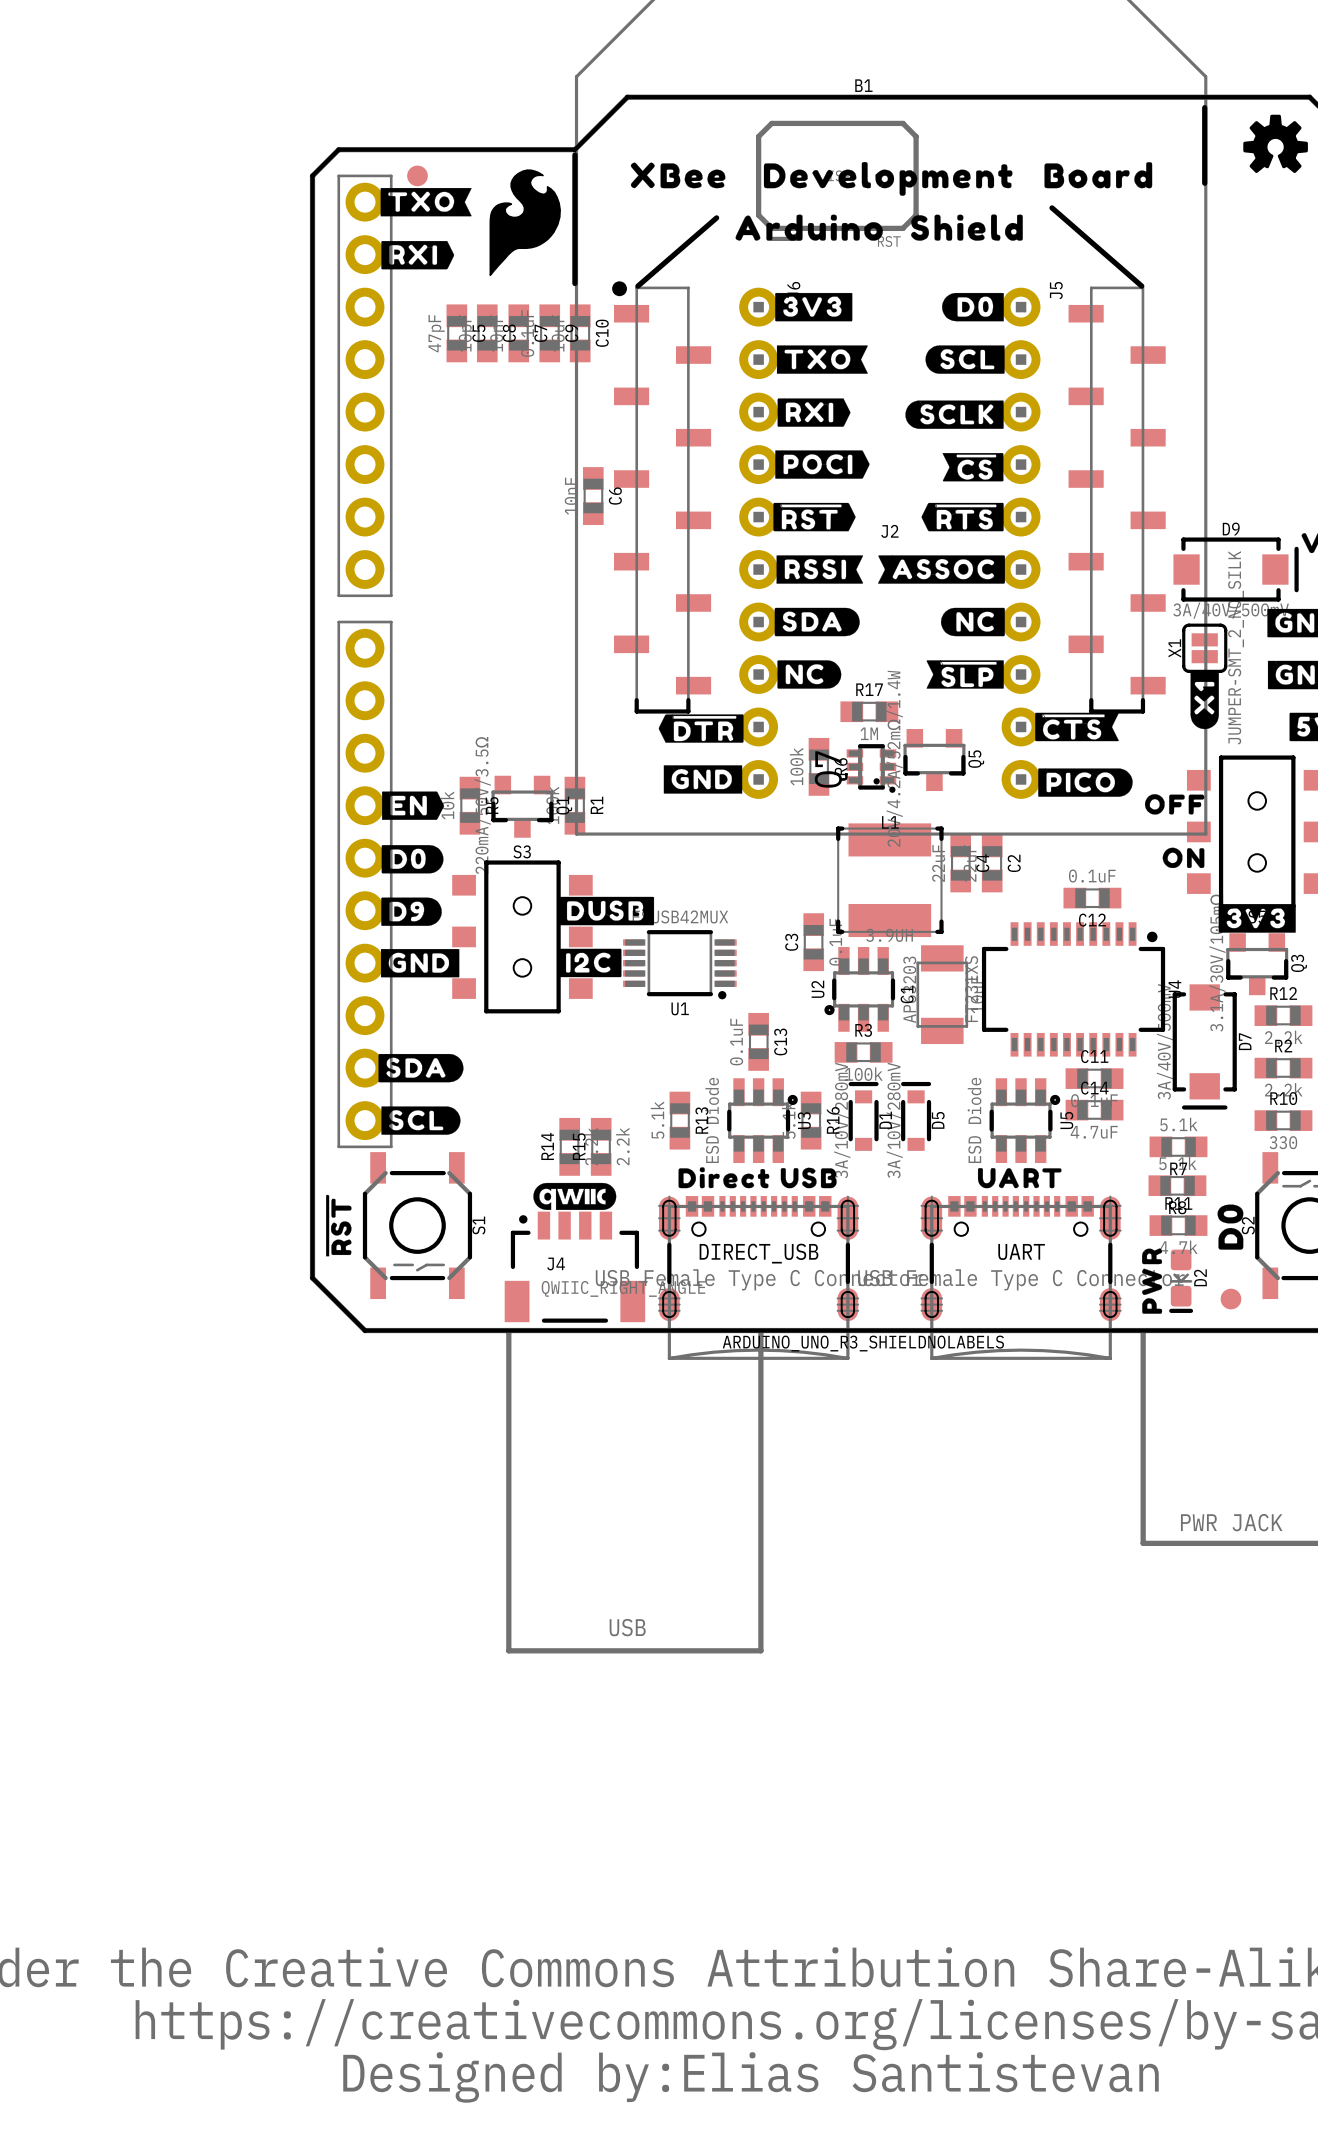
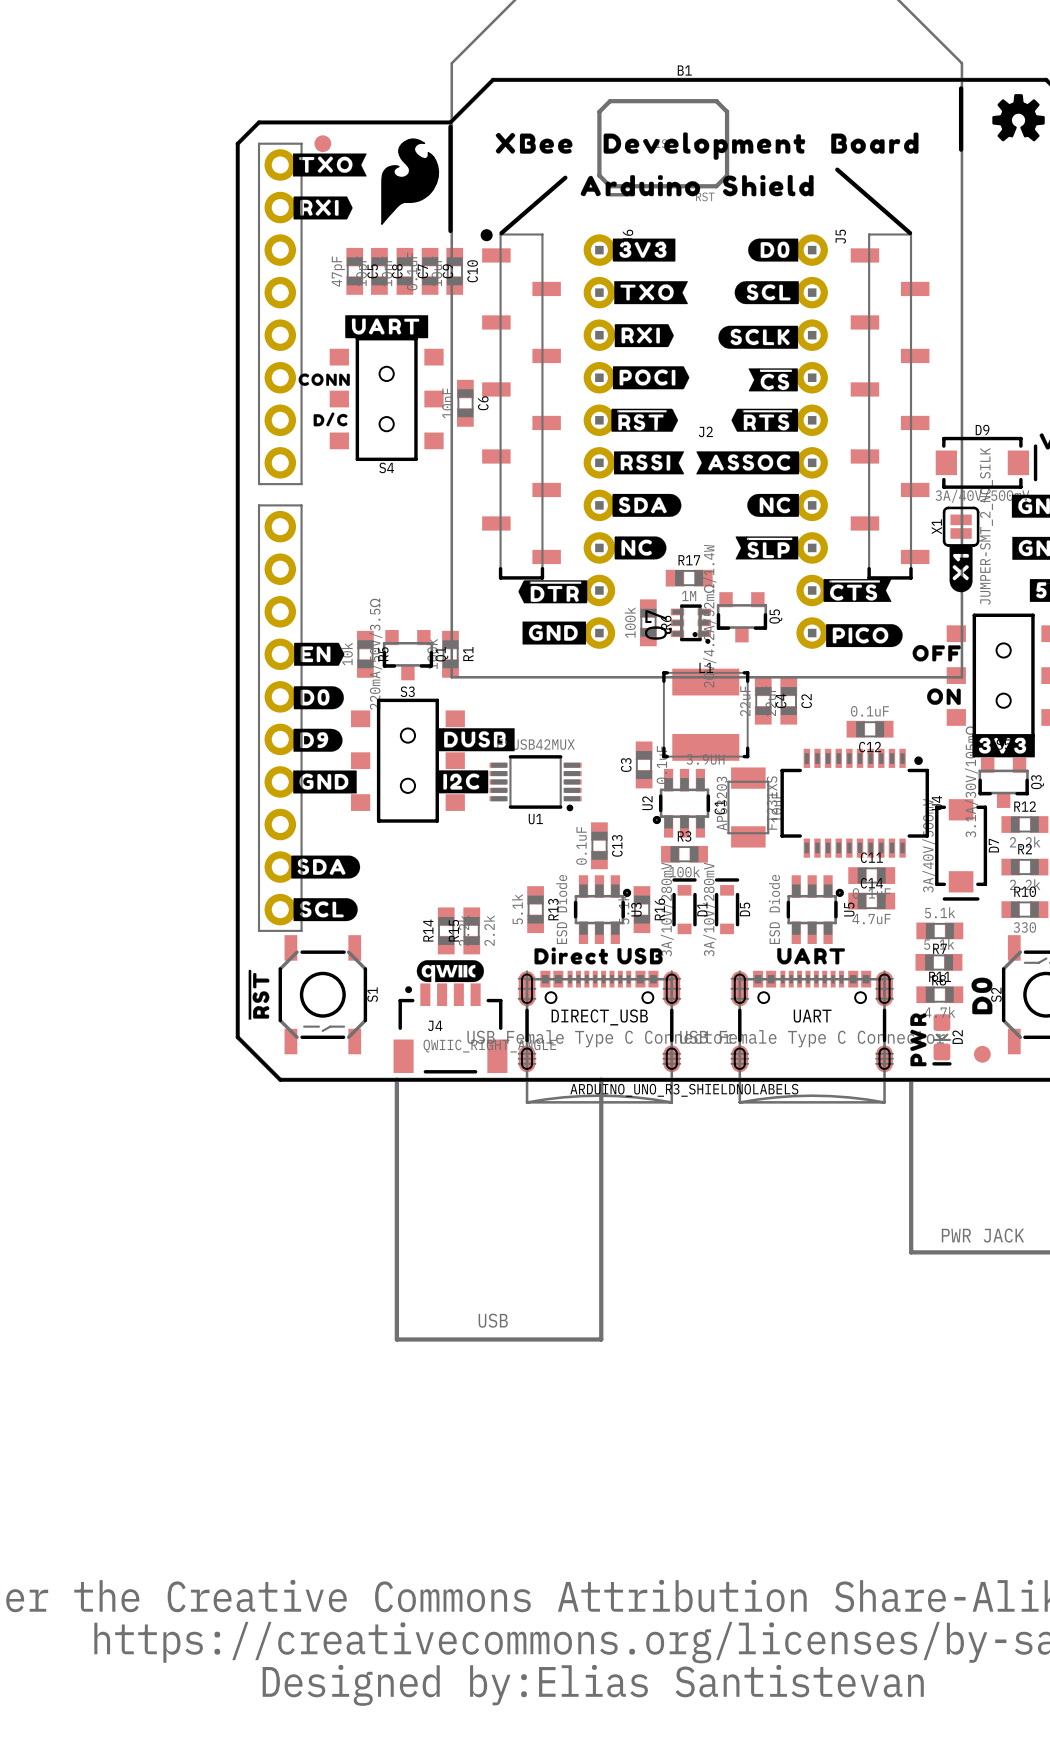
drawing: none -> [345, 315, 429, 339]
drawing: none -> [298, 373, 350, 386]
S4: none -> (386, 399)
drawing: none -> [313, 412, 348, 427]

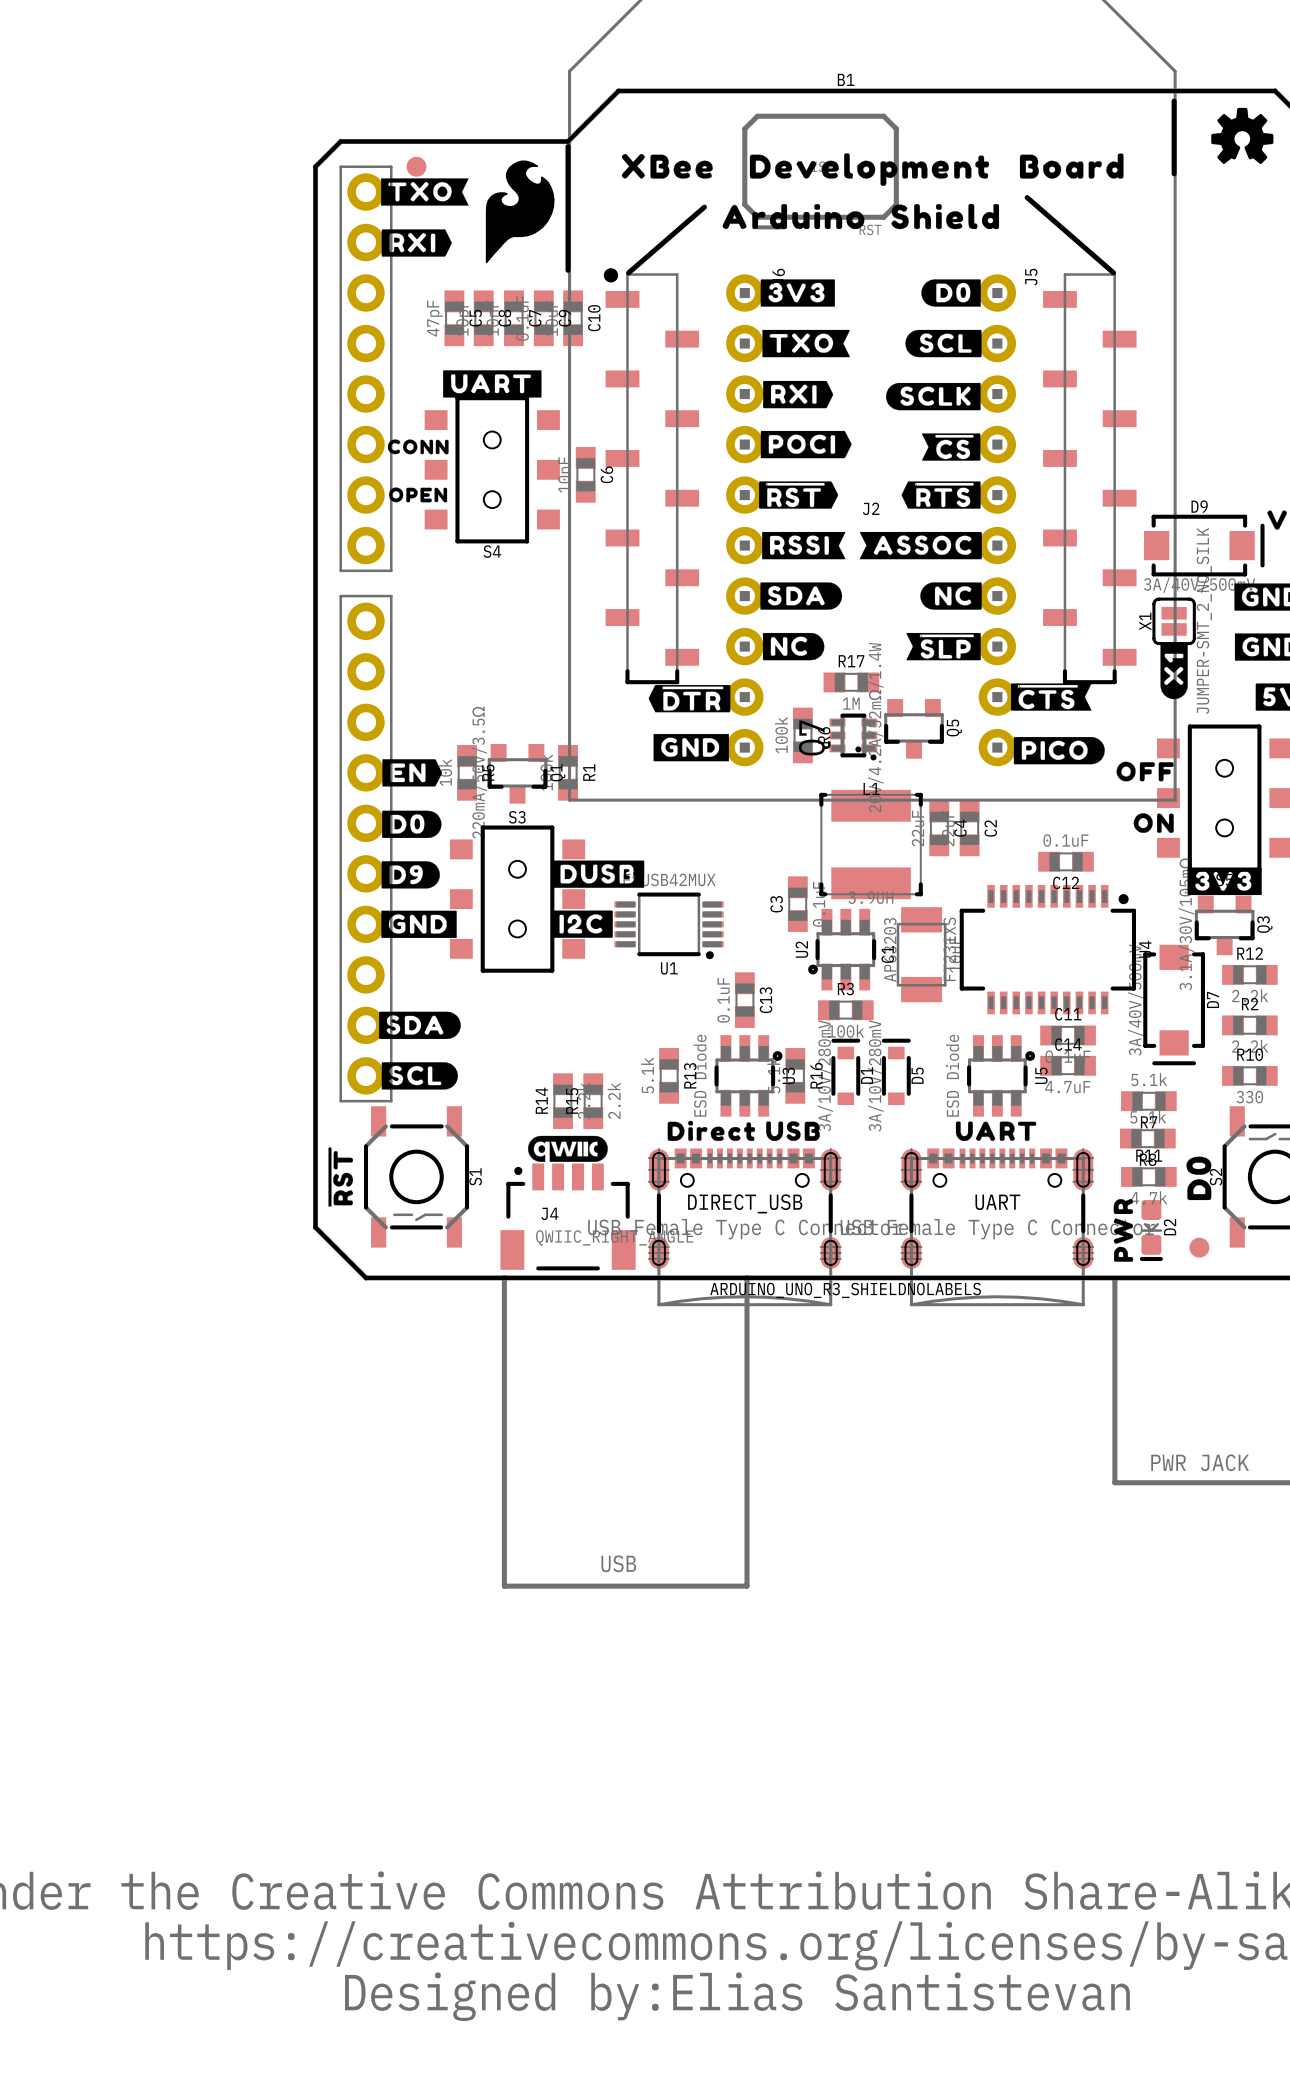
drawing shape: [313, 412, 348, 427] -> [389, 487, 448, 503]

